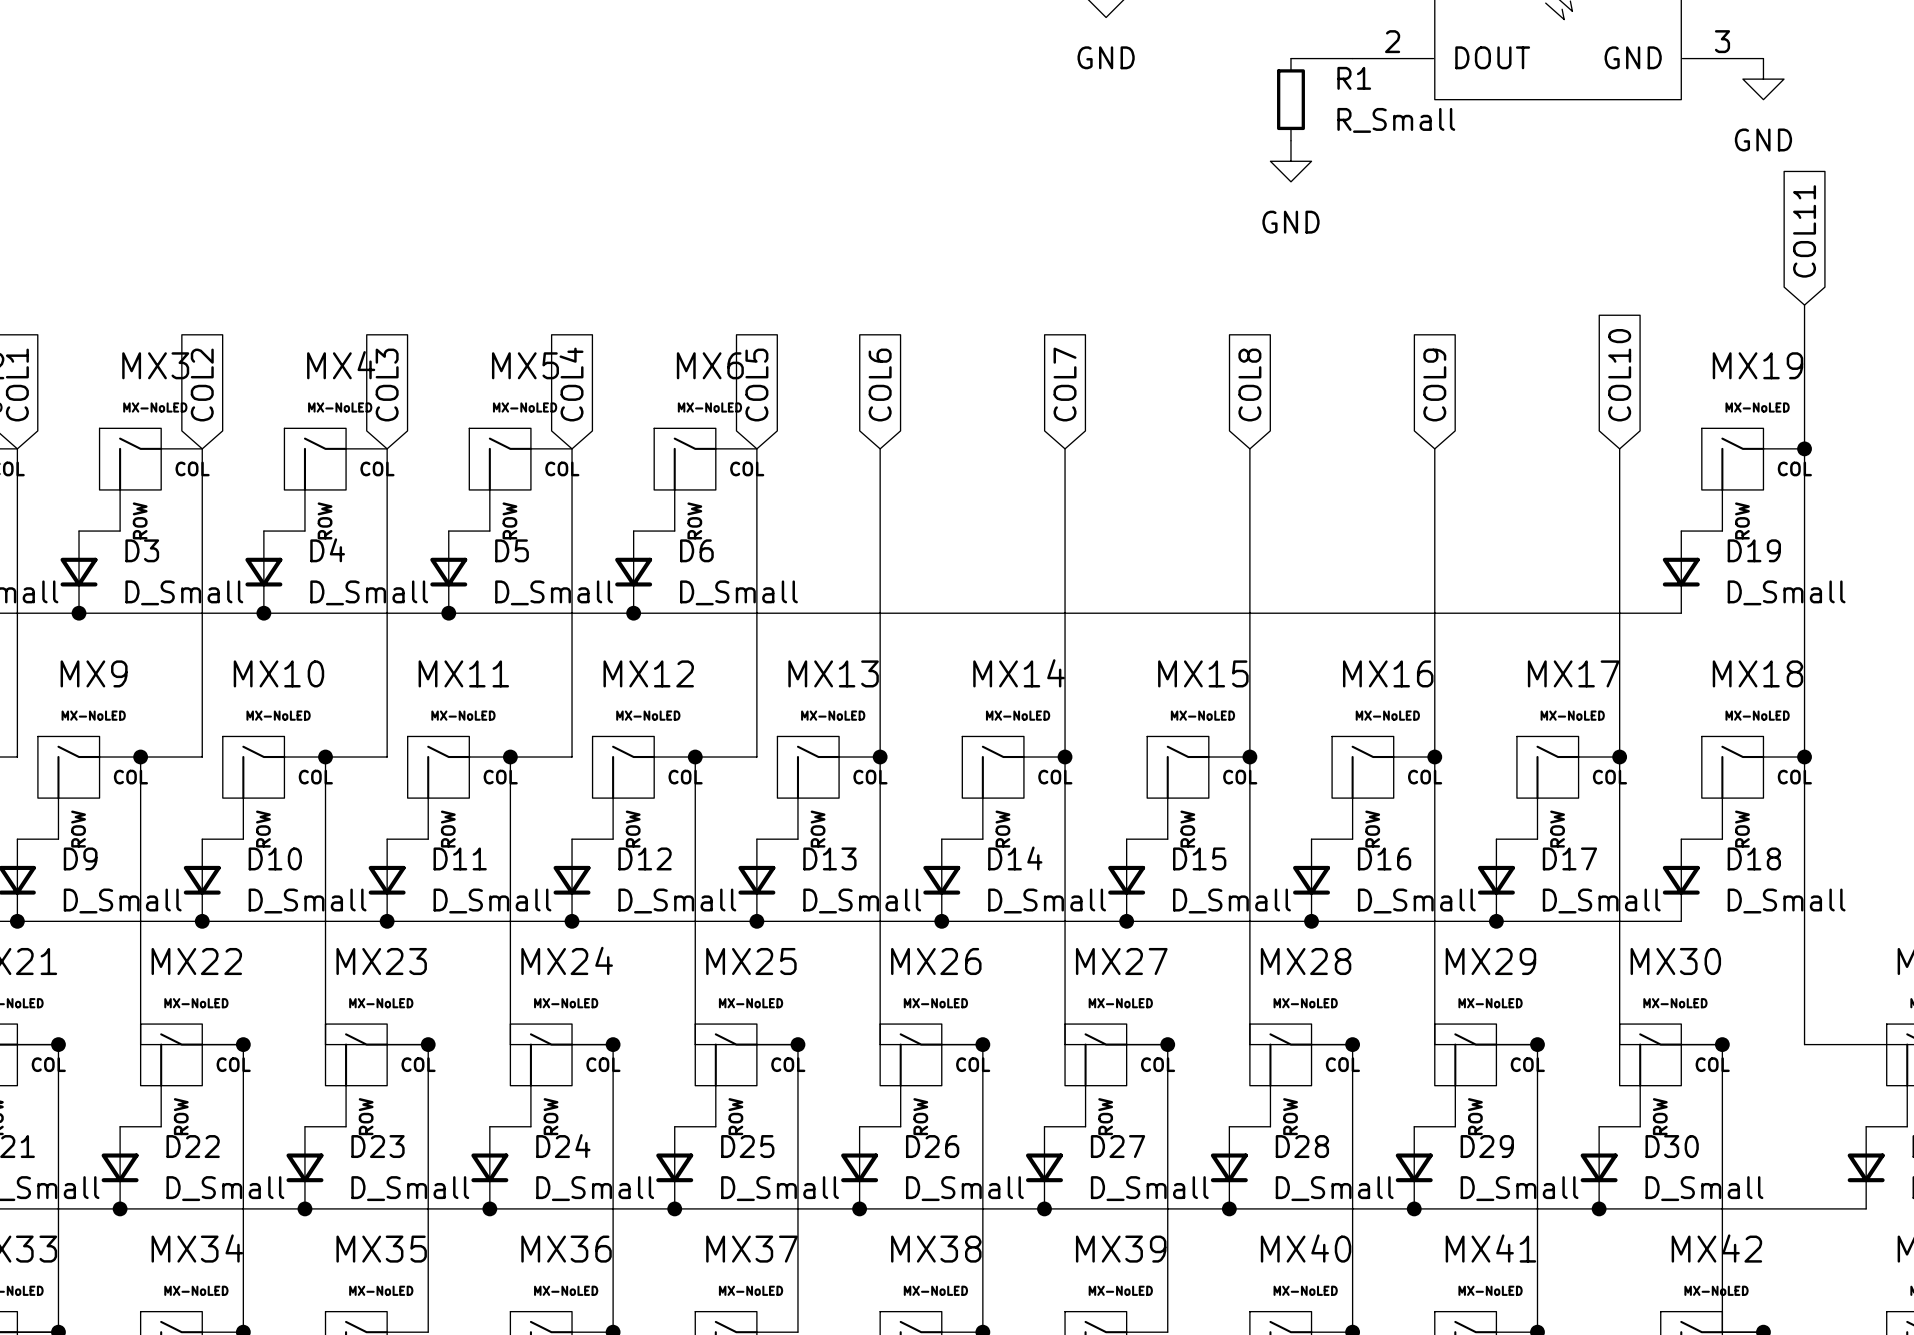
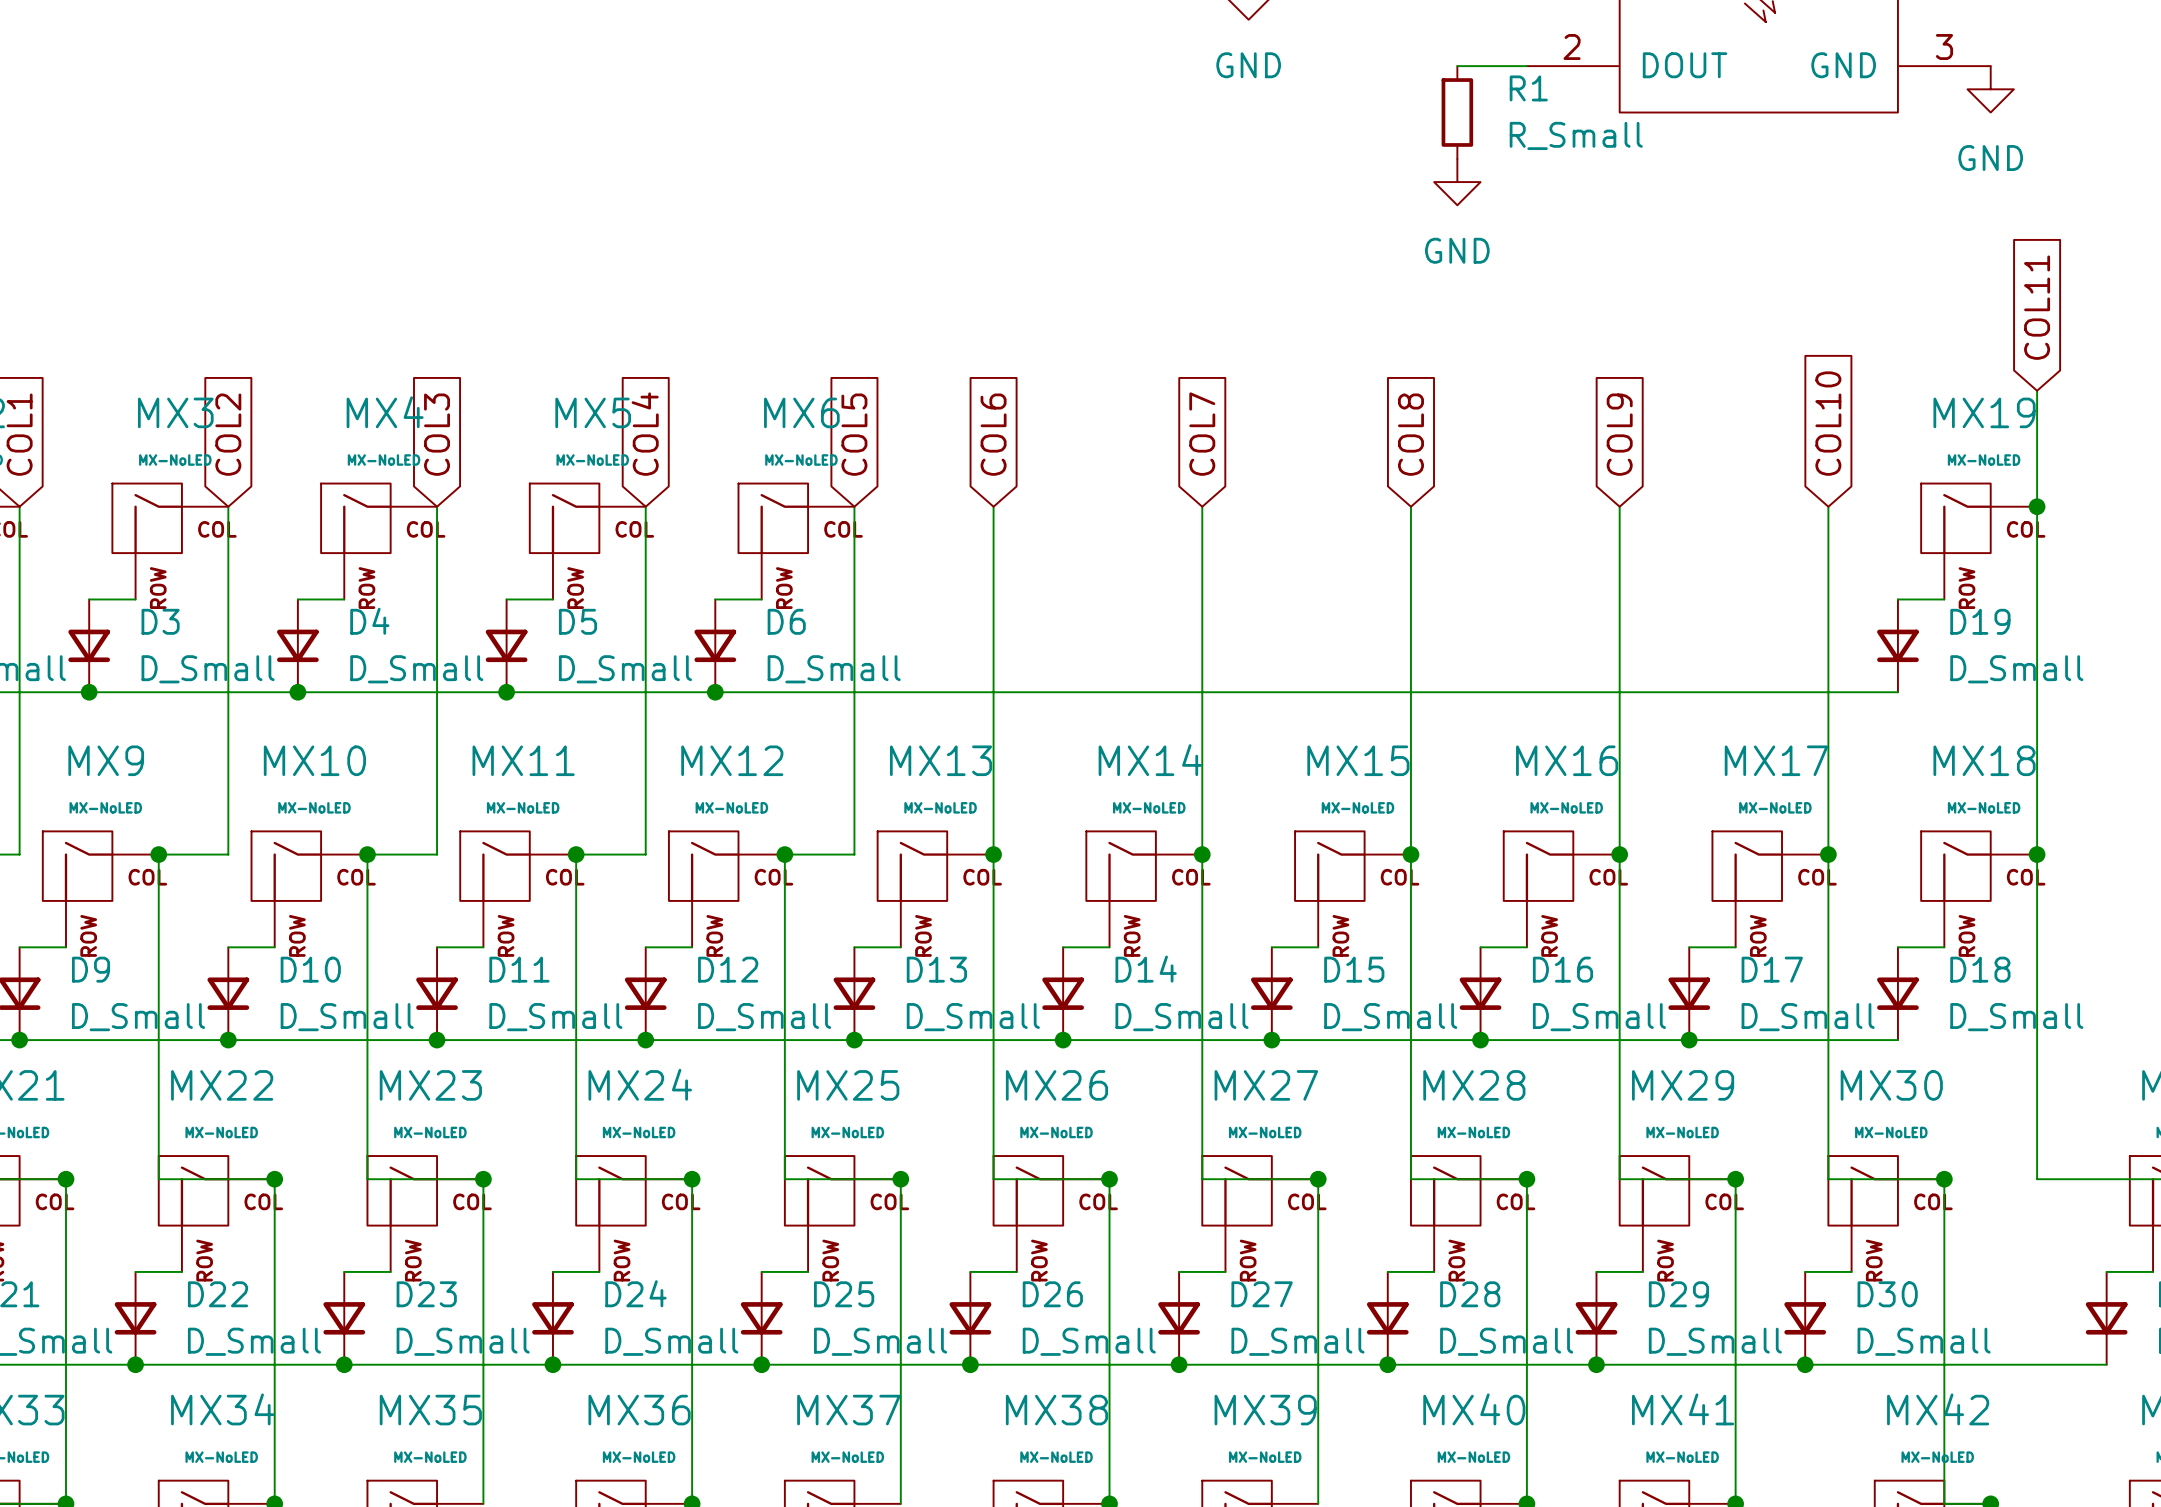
global label position: COL11 (1804, 231) -> COL11 (2037, 307)
wire: (1804, 305) (1804, 346) -> none

